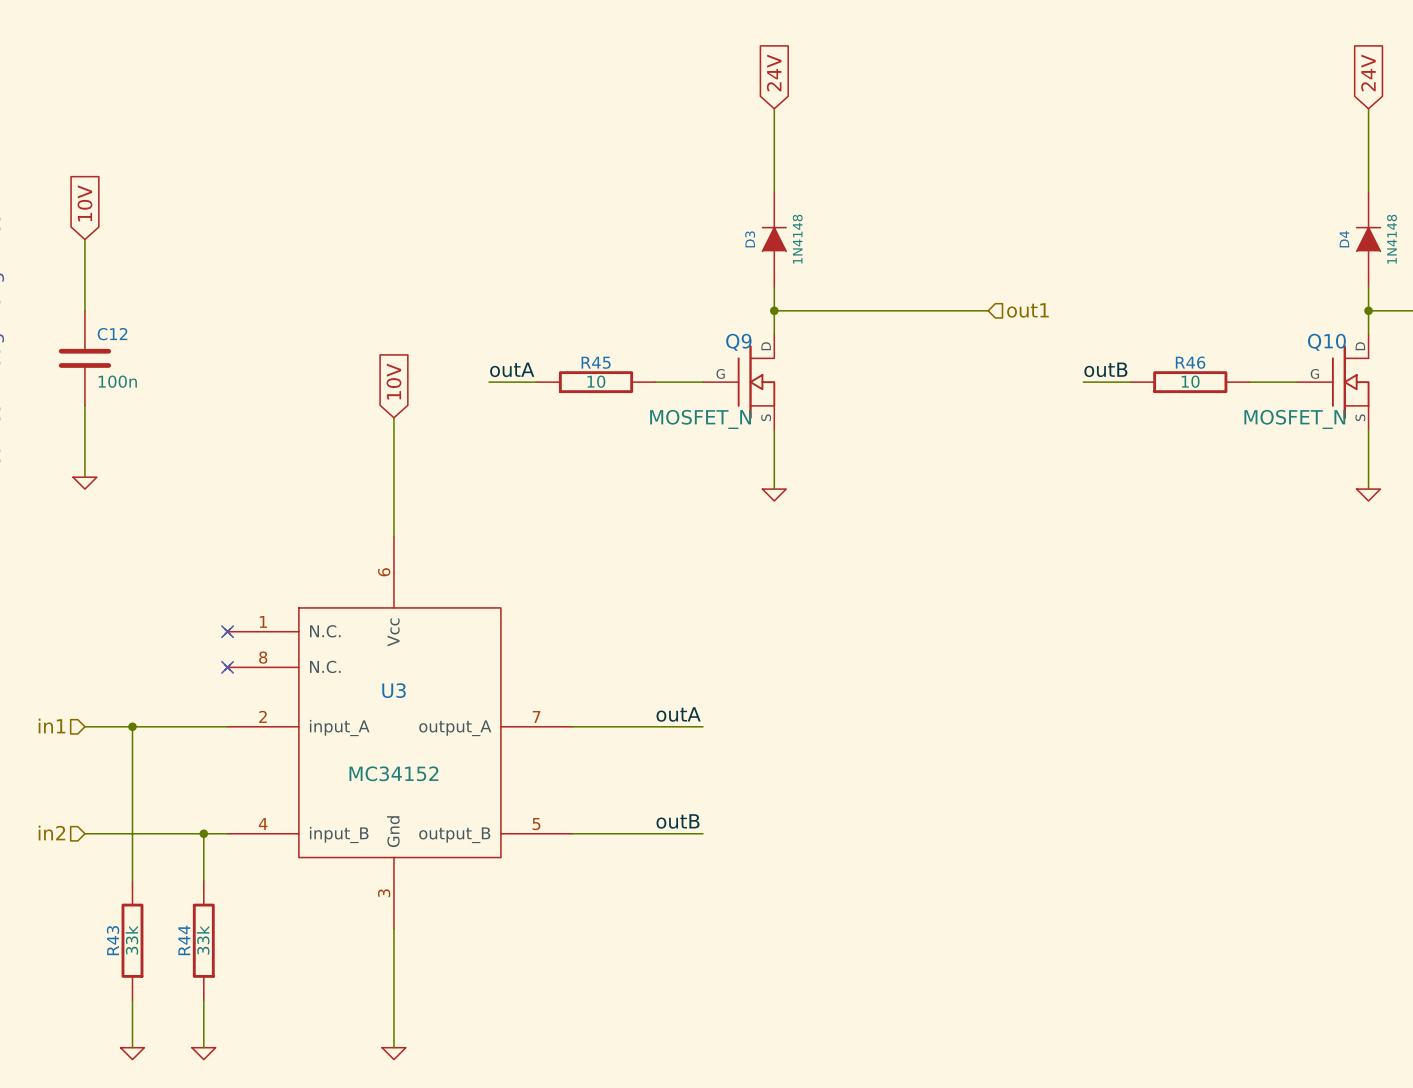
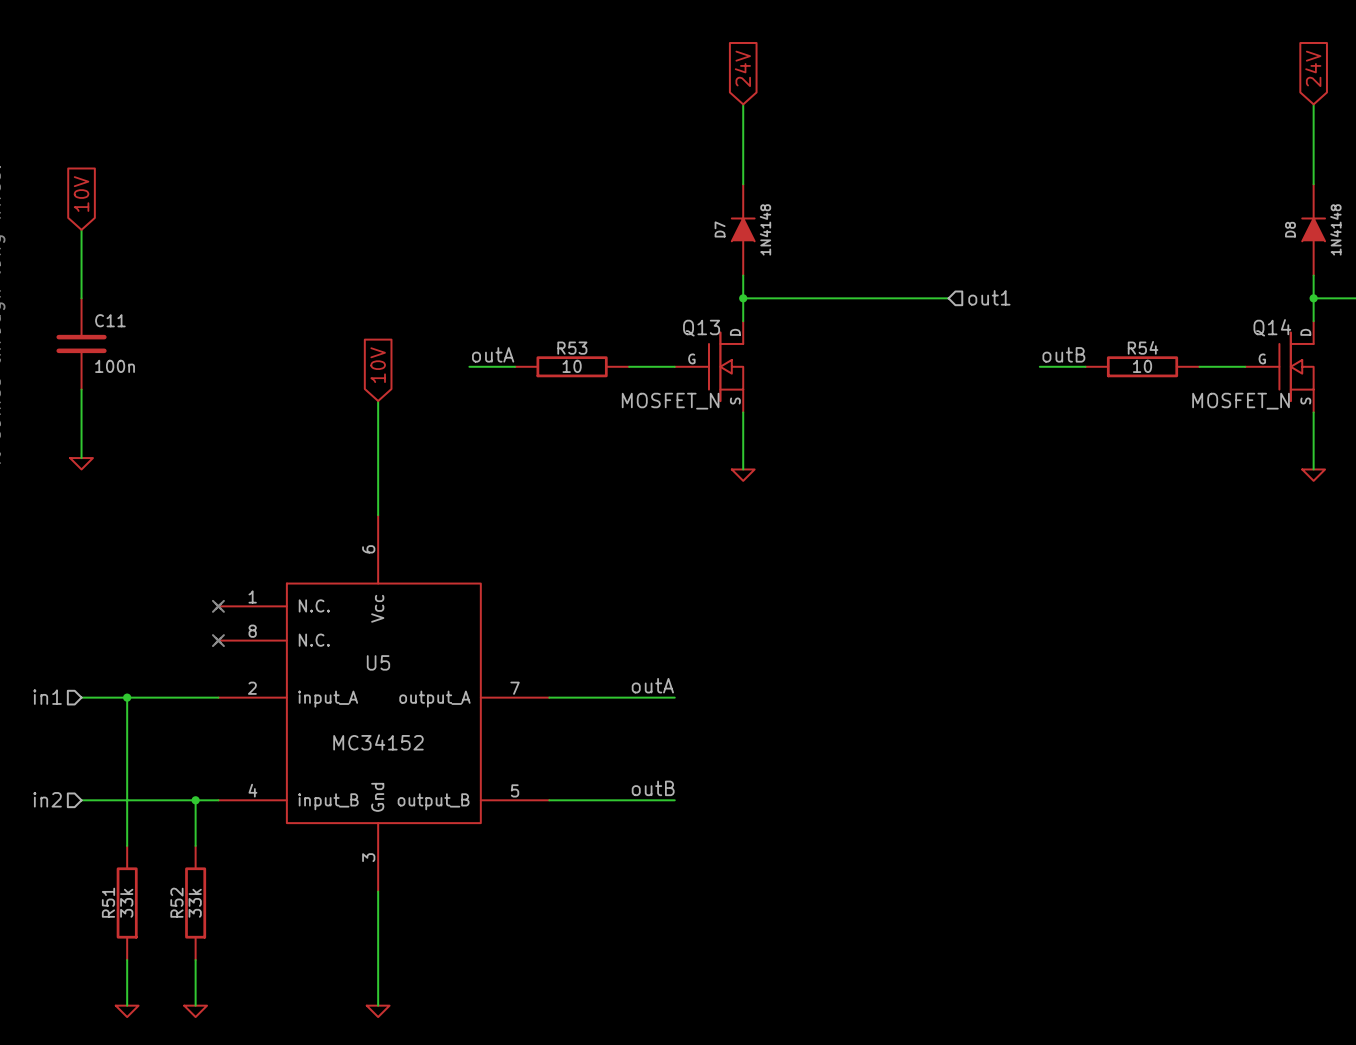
D3 name: D3 (750, 239) -> D7 (720, 229)
D4 name: D4 (1344, 239) -> D8 (1290, 229)
C12 name: C12 (112, 334) -> C11 (110, 320)
Q9 name: Q9 (738, 342) -> Q13 (701, 328)
Q10 name: Q10 (1326, 342) -> Q14 (1272, 327)
R45 name: R45 (596, 362) -> R53 (572, 348)
R46 name: R46 (1190, 362) -> R54 (1143, 347)
U3 name: U3 (394, 690) -> U5 (378, 662)
R43 name: R43 (113, 940) -> R51 (108, 902)
R44 name: R44 (184, 940) -> R52 (176, 902)

